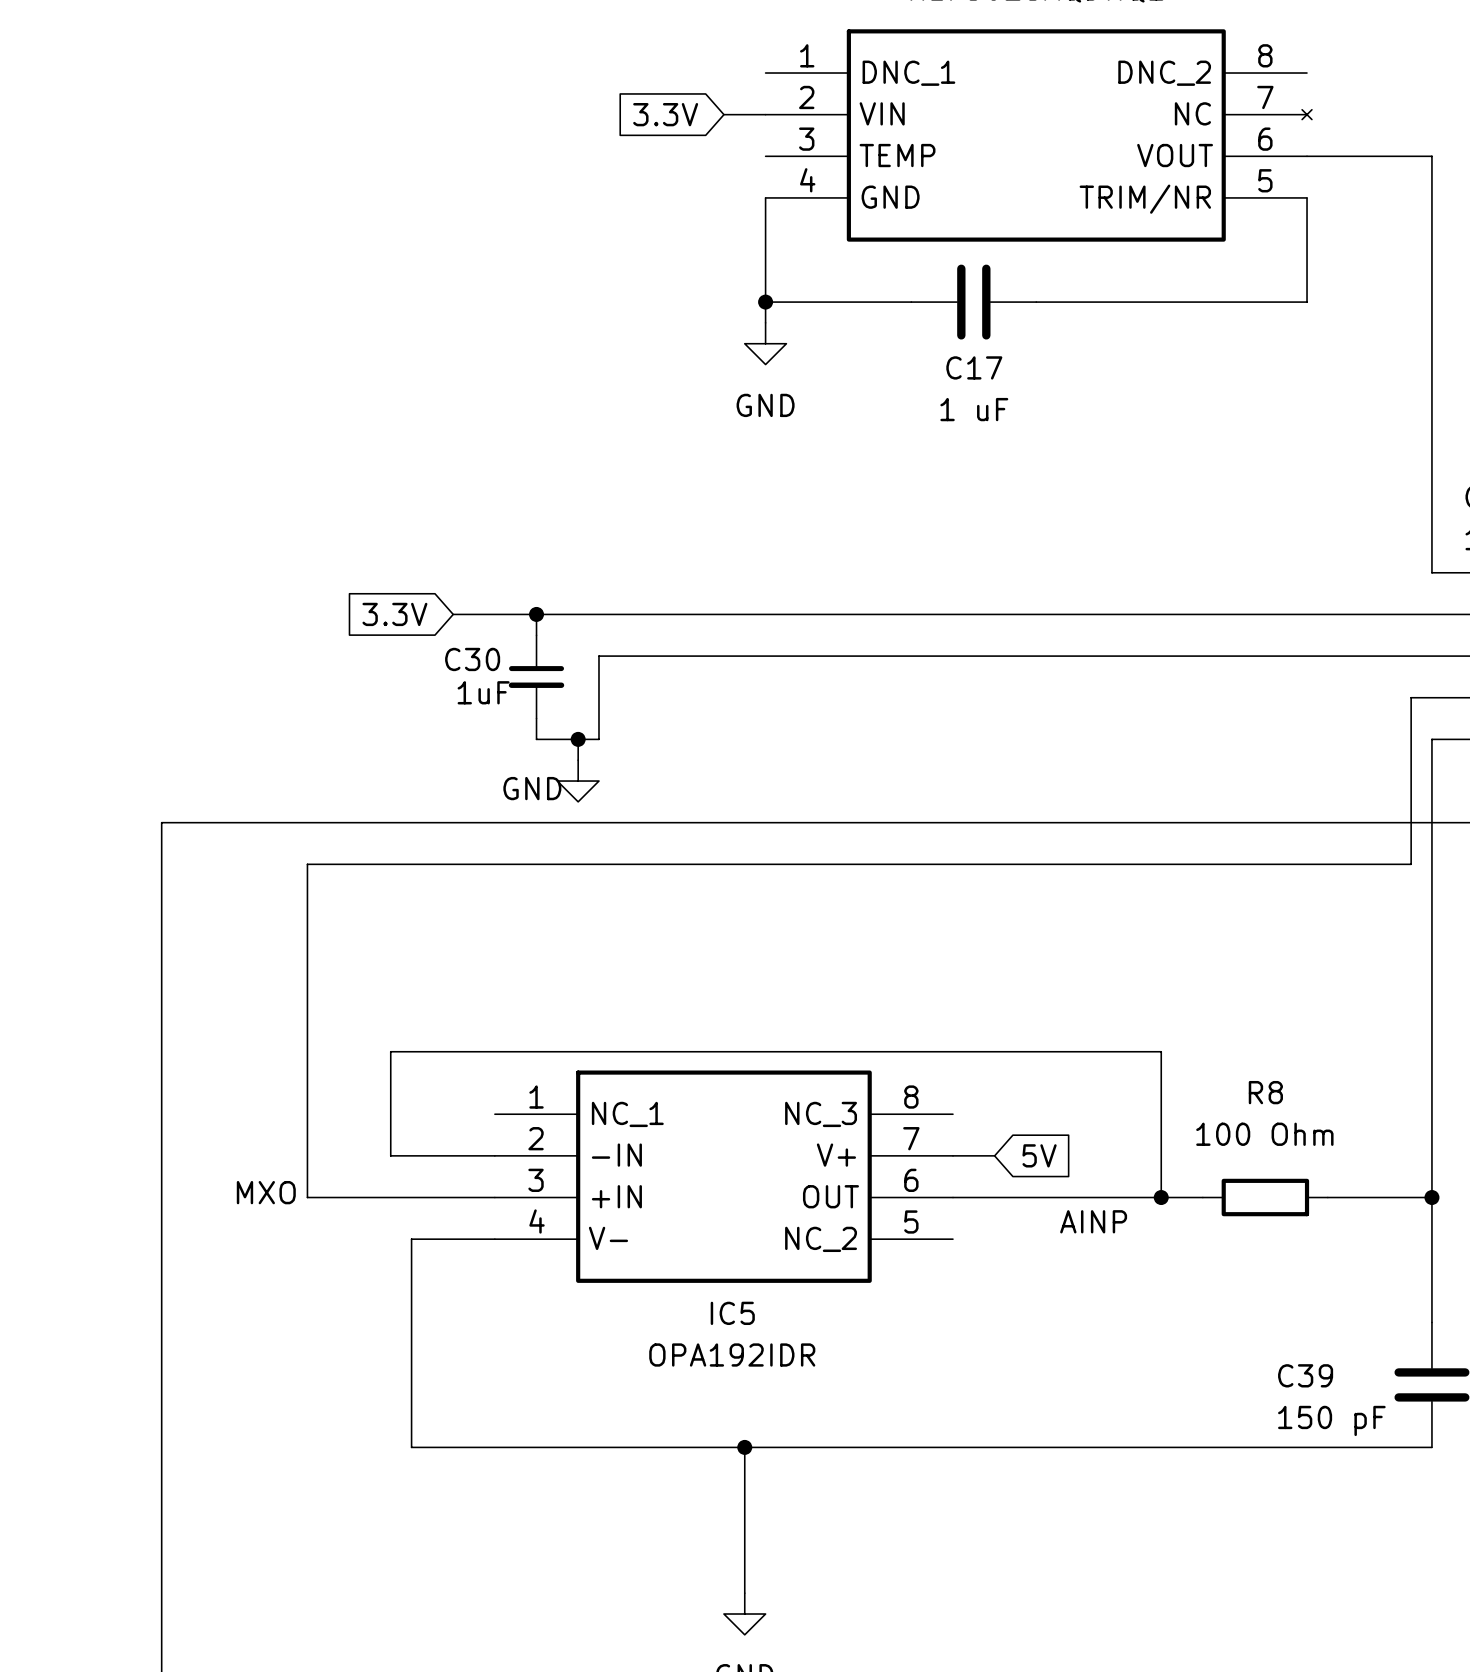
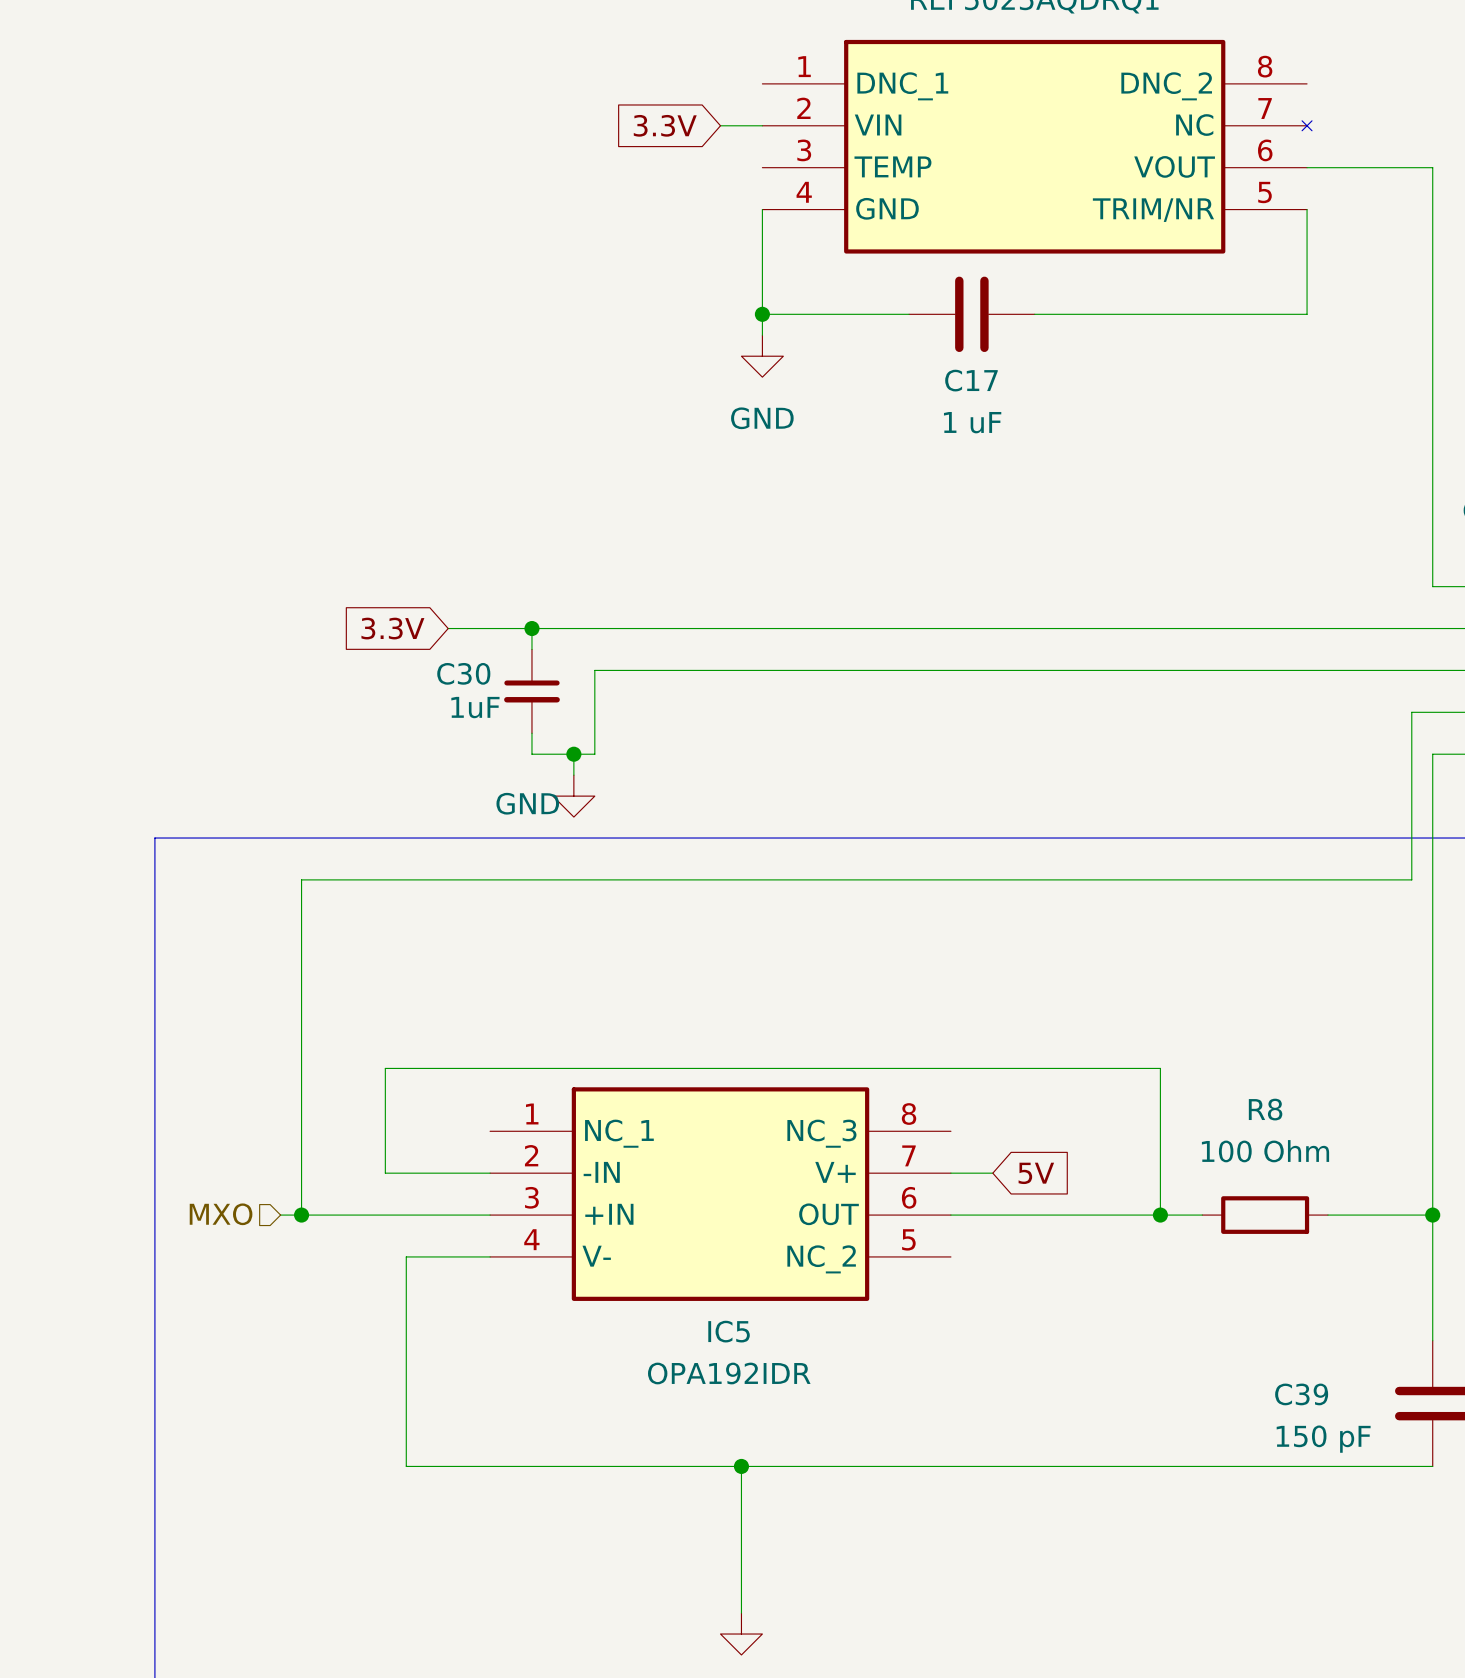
text: MXO (266, 1192) -> none
hierarchical label: none -> MXO (221, 1214)
wire: none -> (280, 1215) (301, 1215)
junction: none -> (301, 1215)
text: AINP (1093, 1221) -> none

